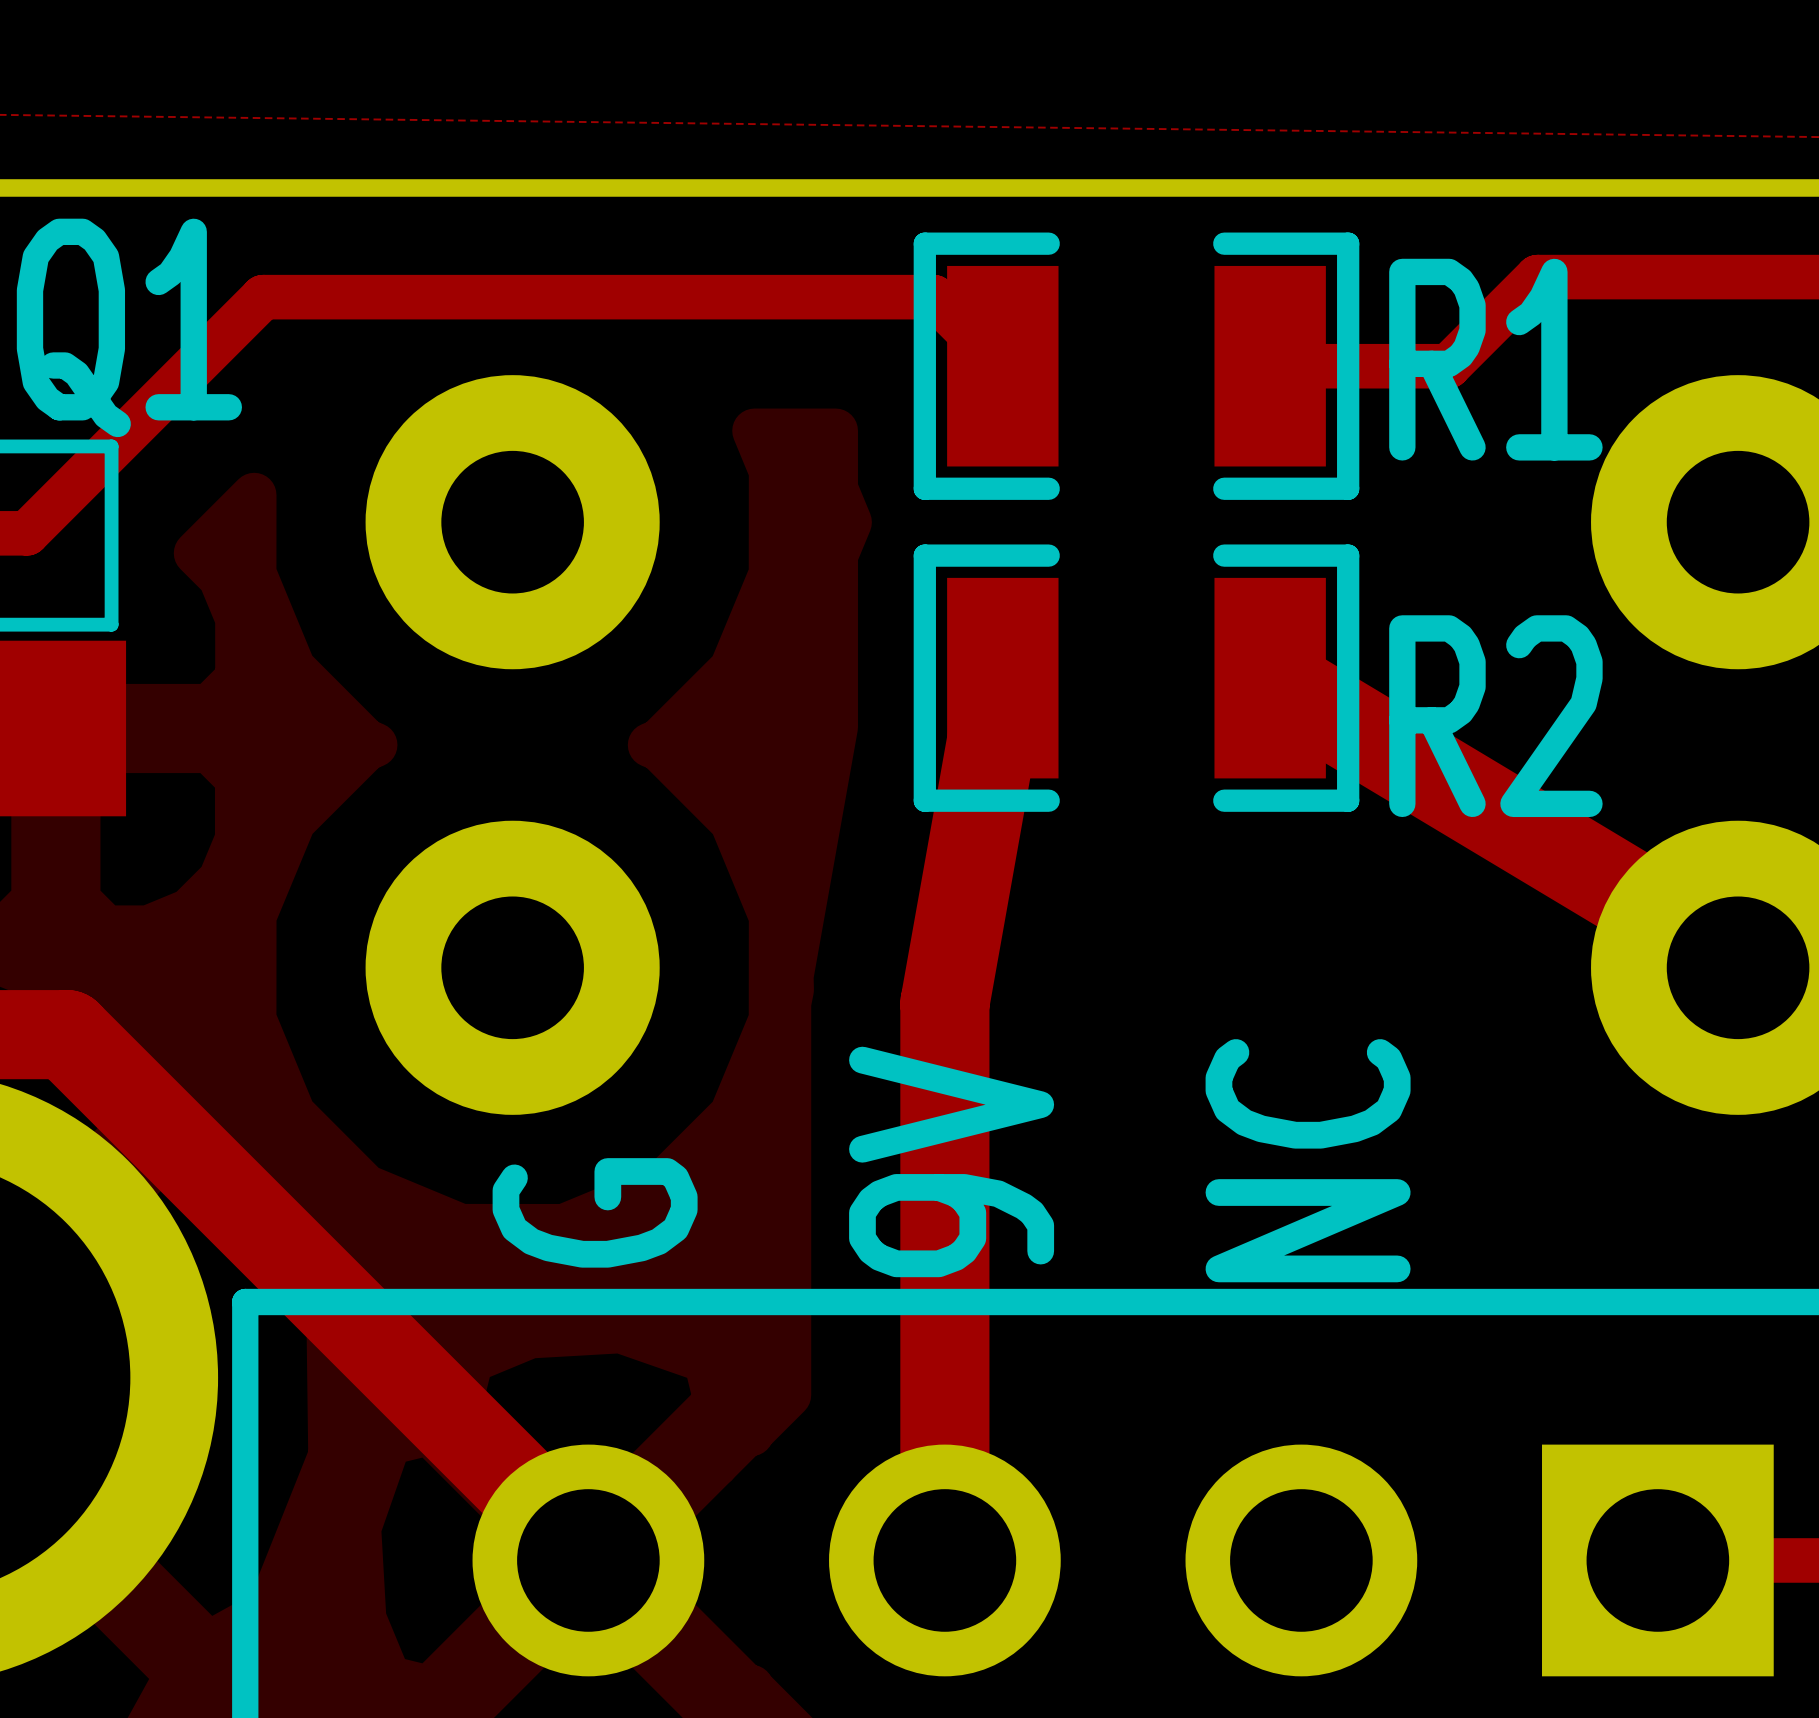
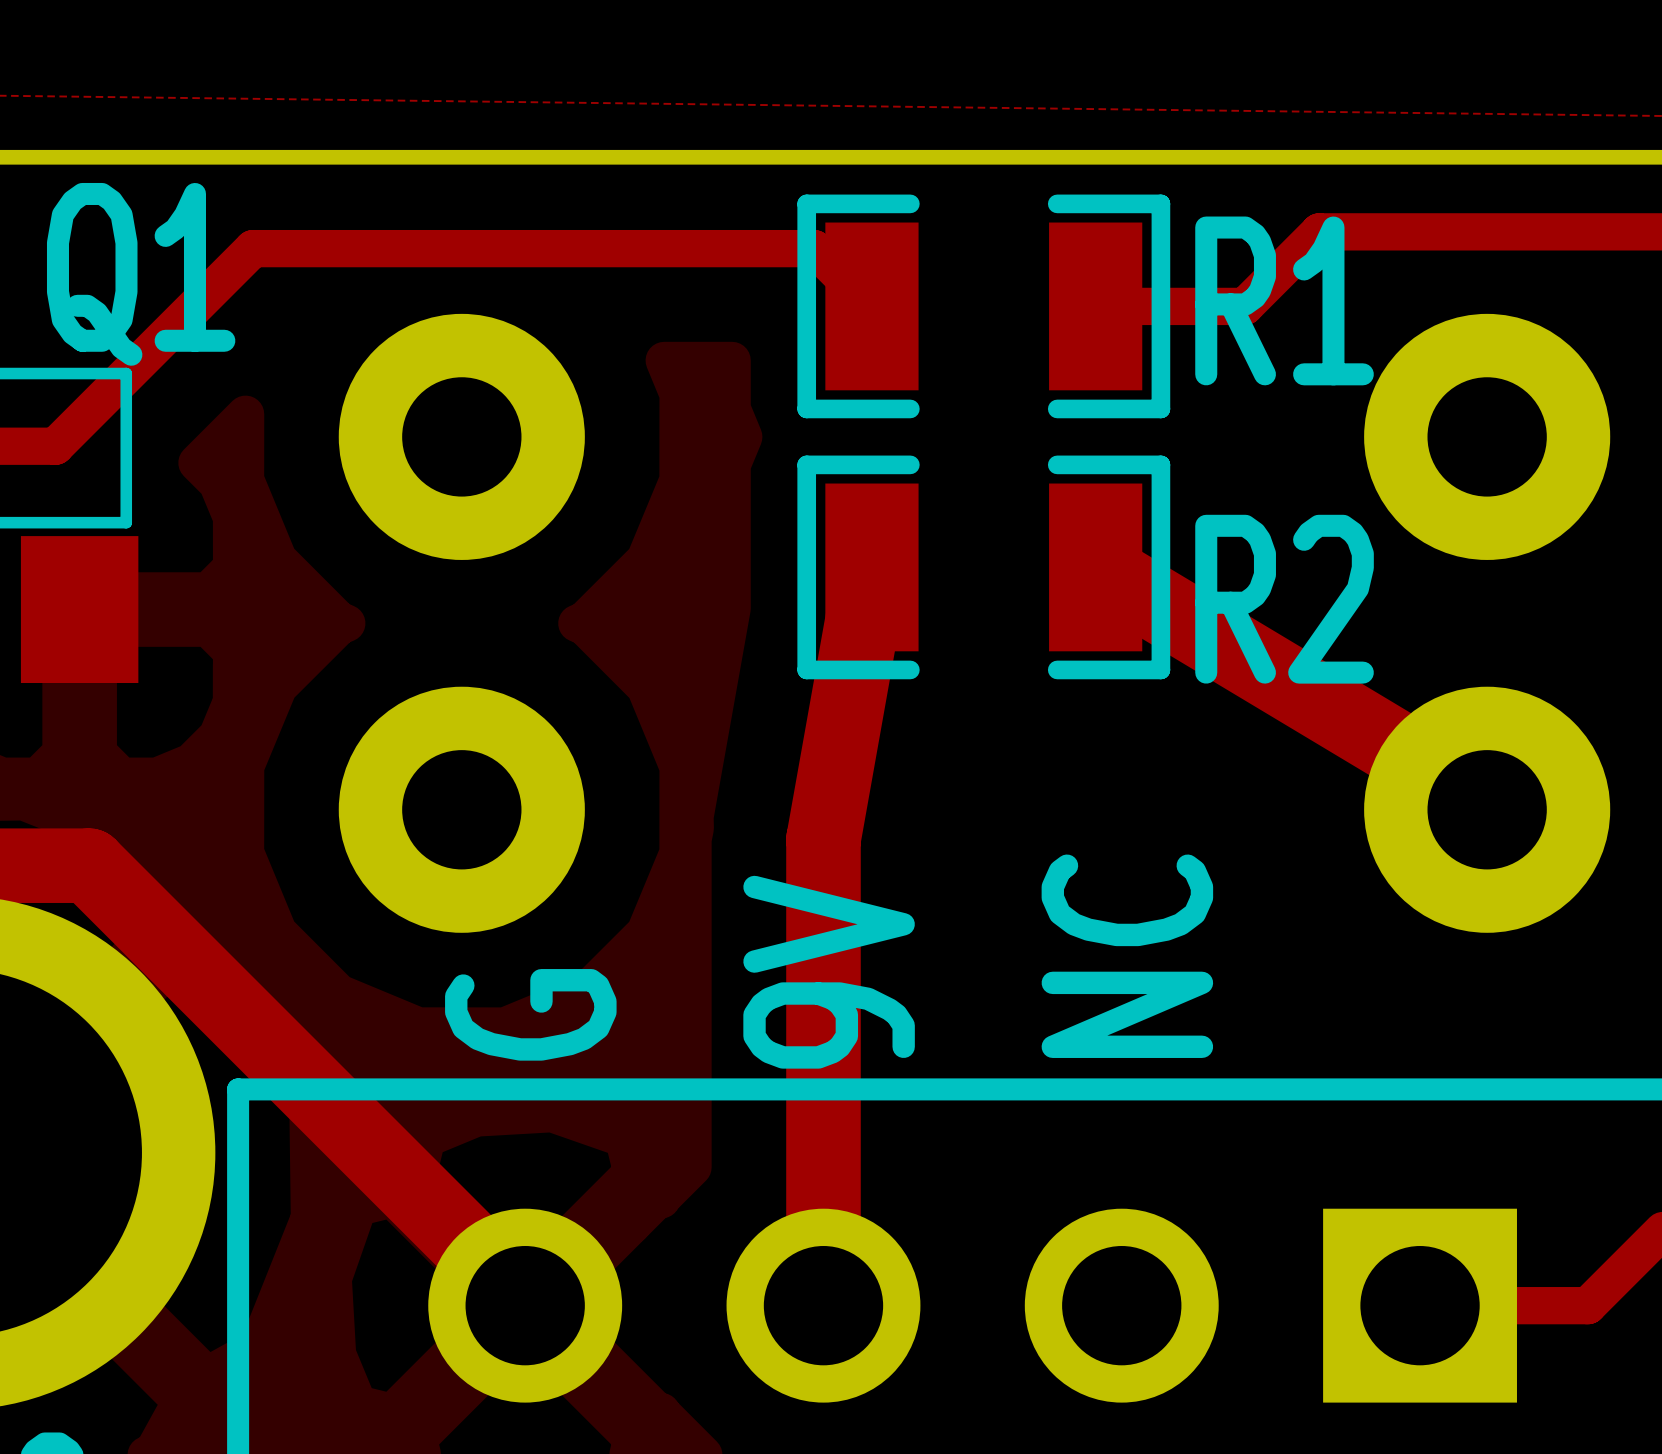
part text position: NC (1308, 1160) -> NC (1127, 956)

